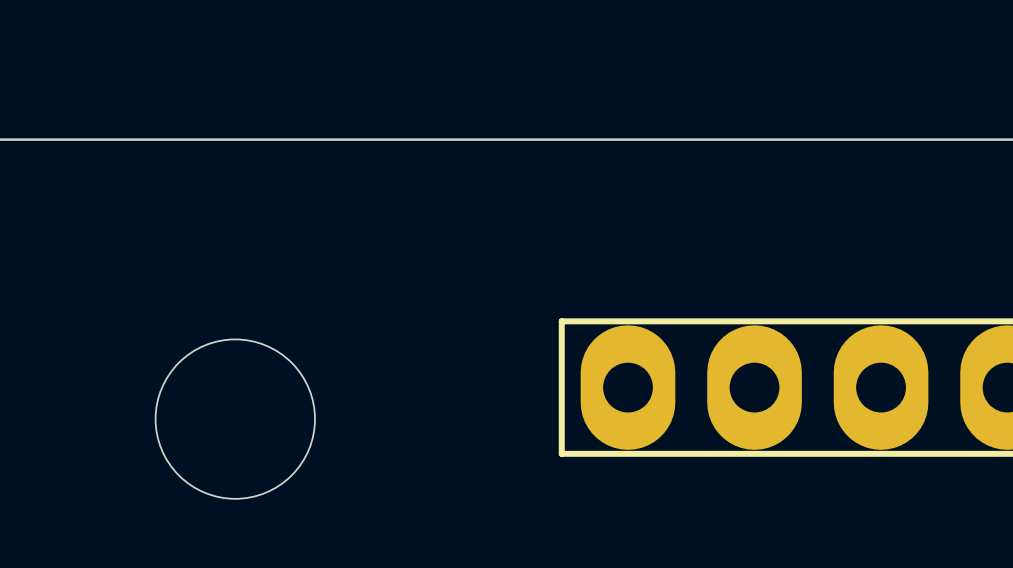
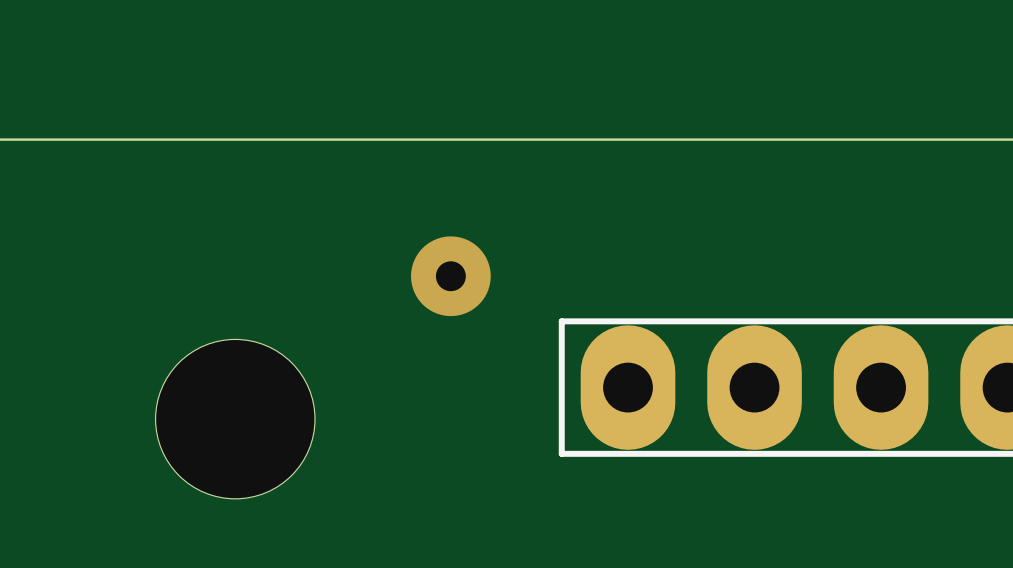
via: none -> (450, 276)

